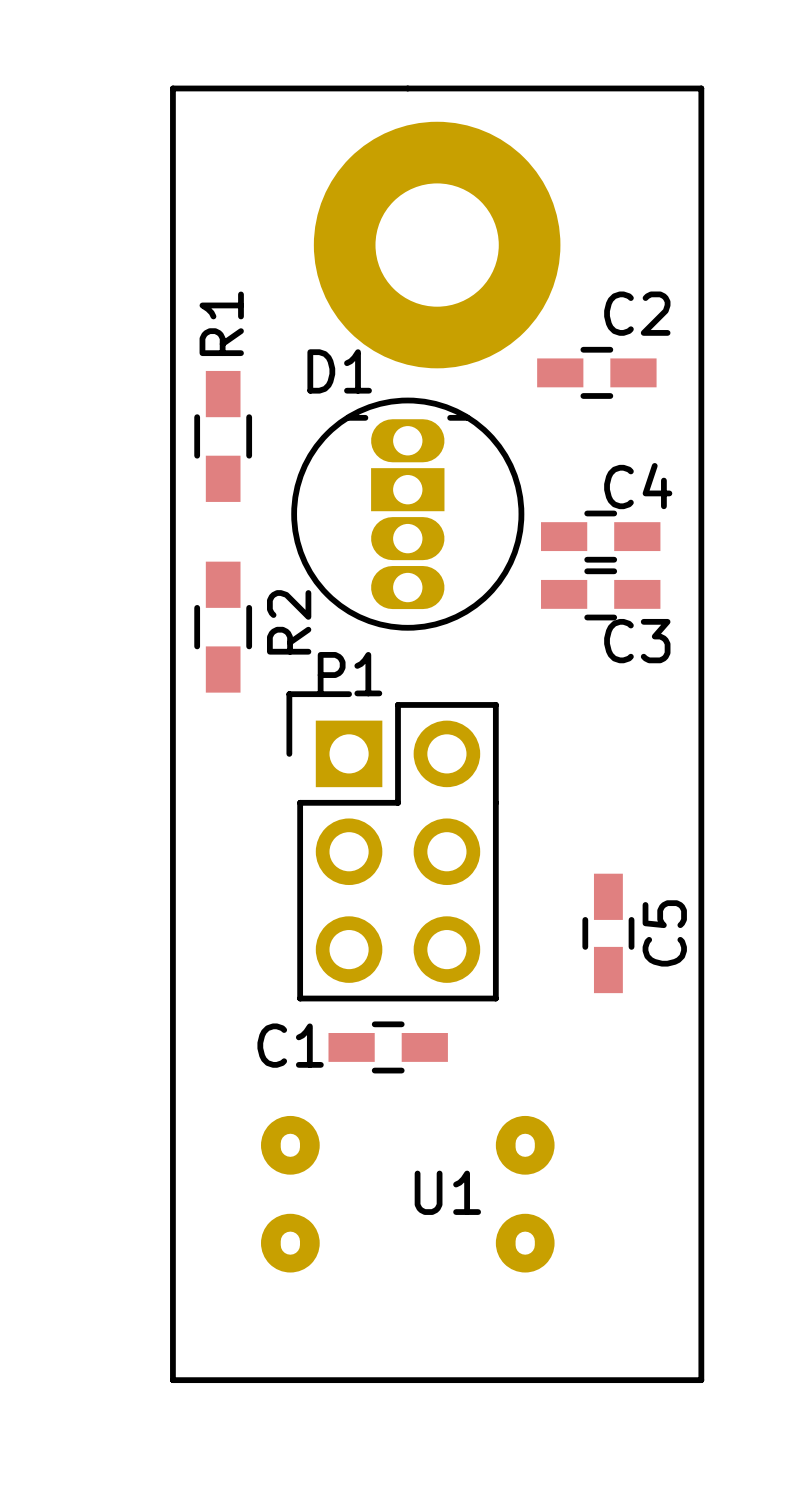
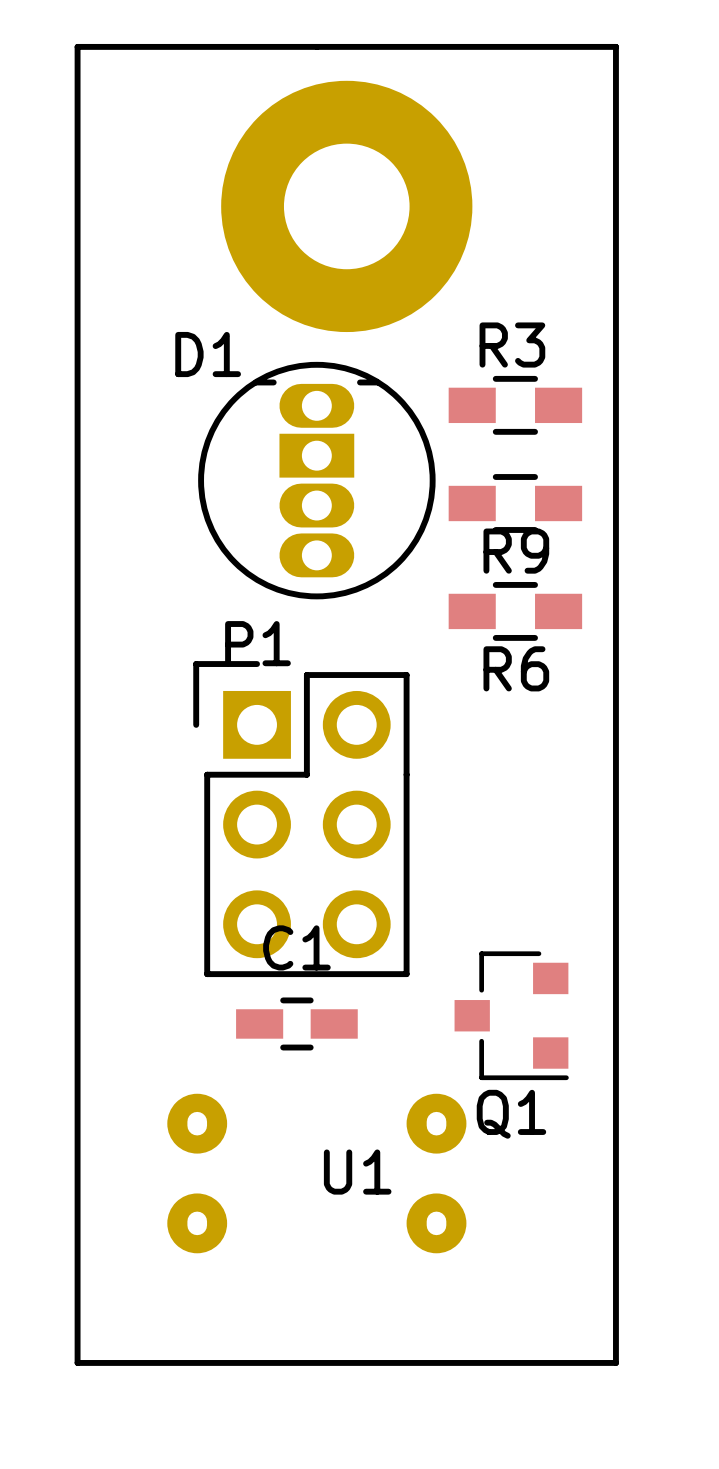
D1 name position: D1 (339, 371) -> D1 (208, 354)
C2: (596, 372) -> none
R1: (223, 436) -> none
R3: none -> (515, 405)
C4: (600, 536) -> none
R9: none -> (515, 503)
C3: (600, 594) -> none
R2: (223, 627) -> none
R6: none -> (515, 611)
C5: (608, 933) -> none
Q1: none -> (511, 1015)
C1 name position: C1 (290, 1045) -> C1 (296, 947)

